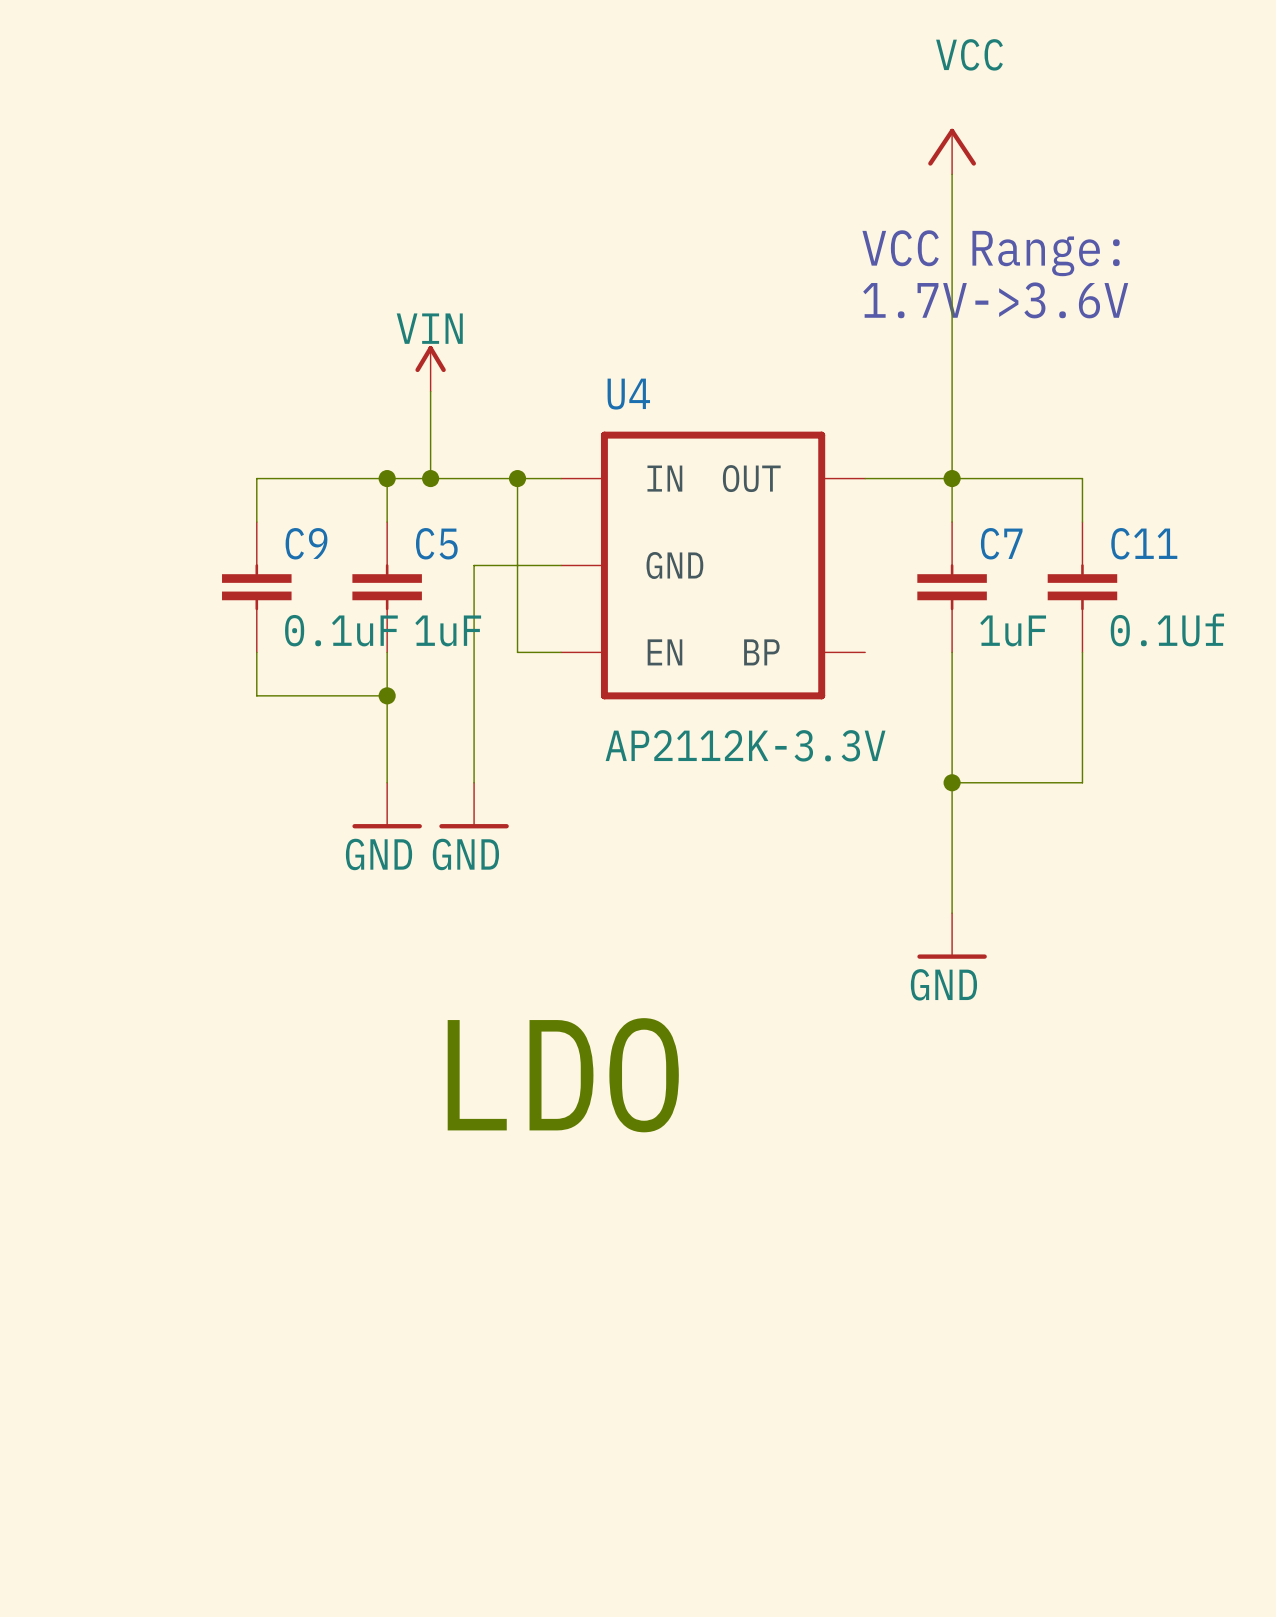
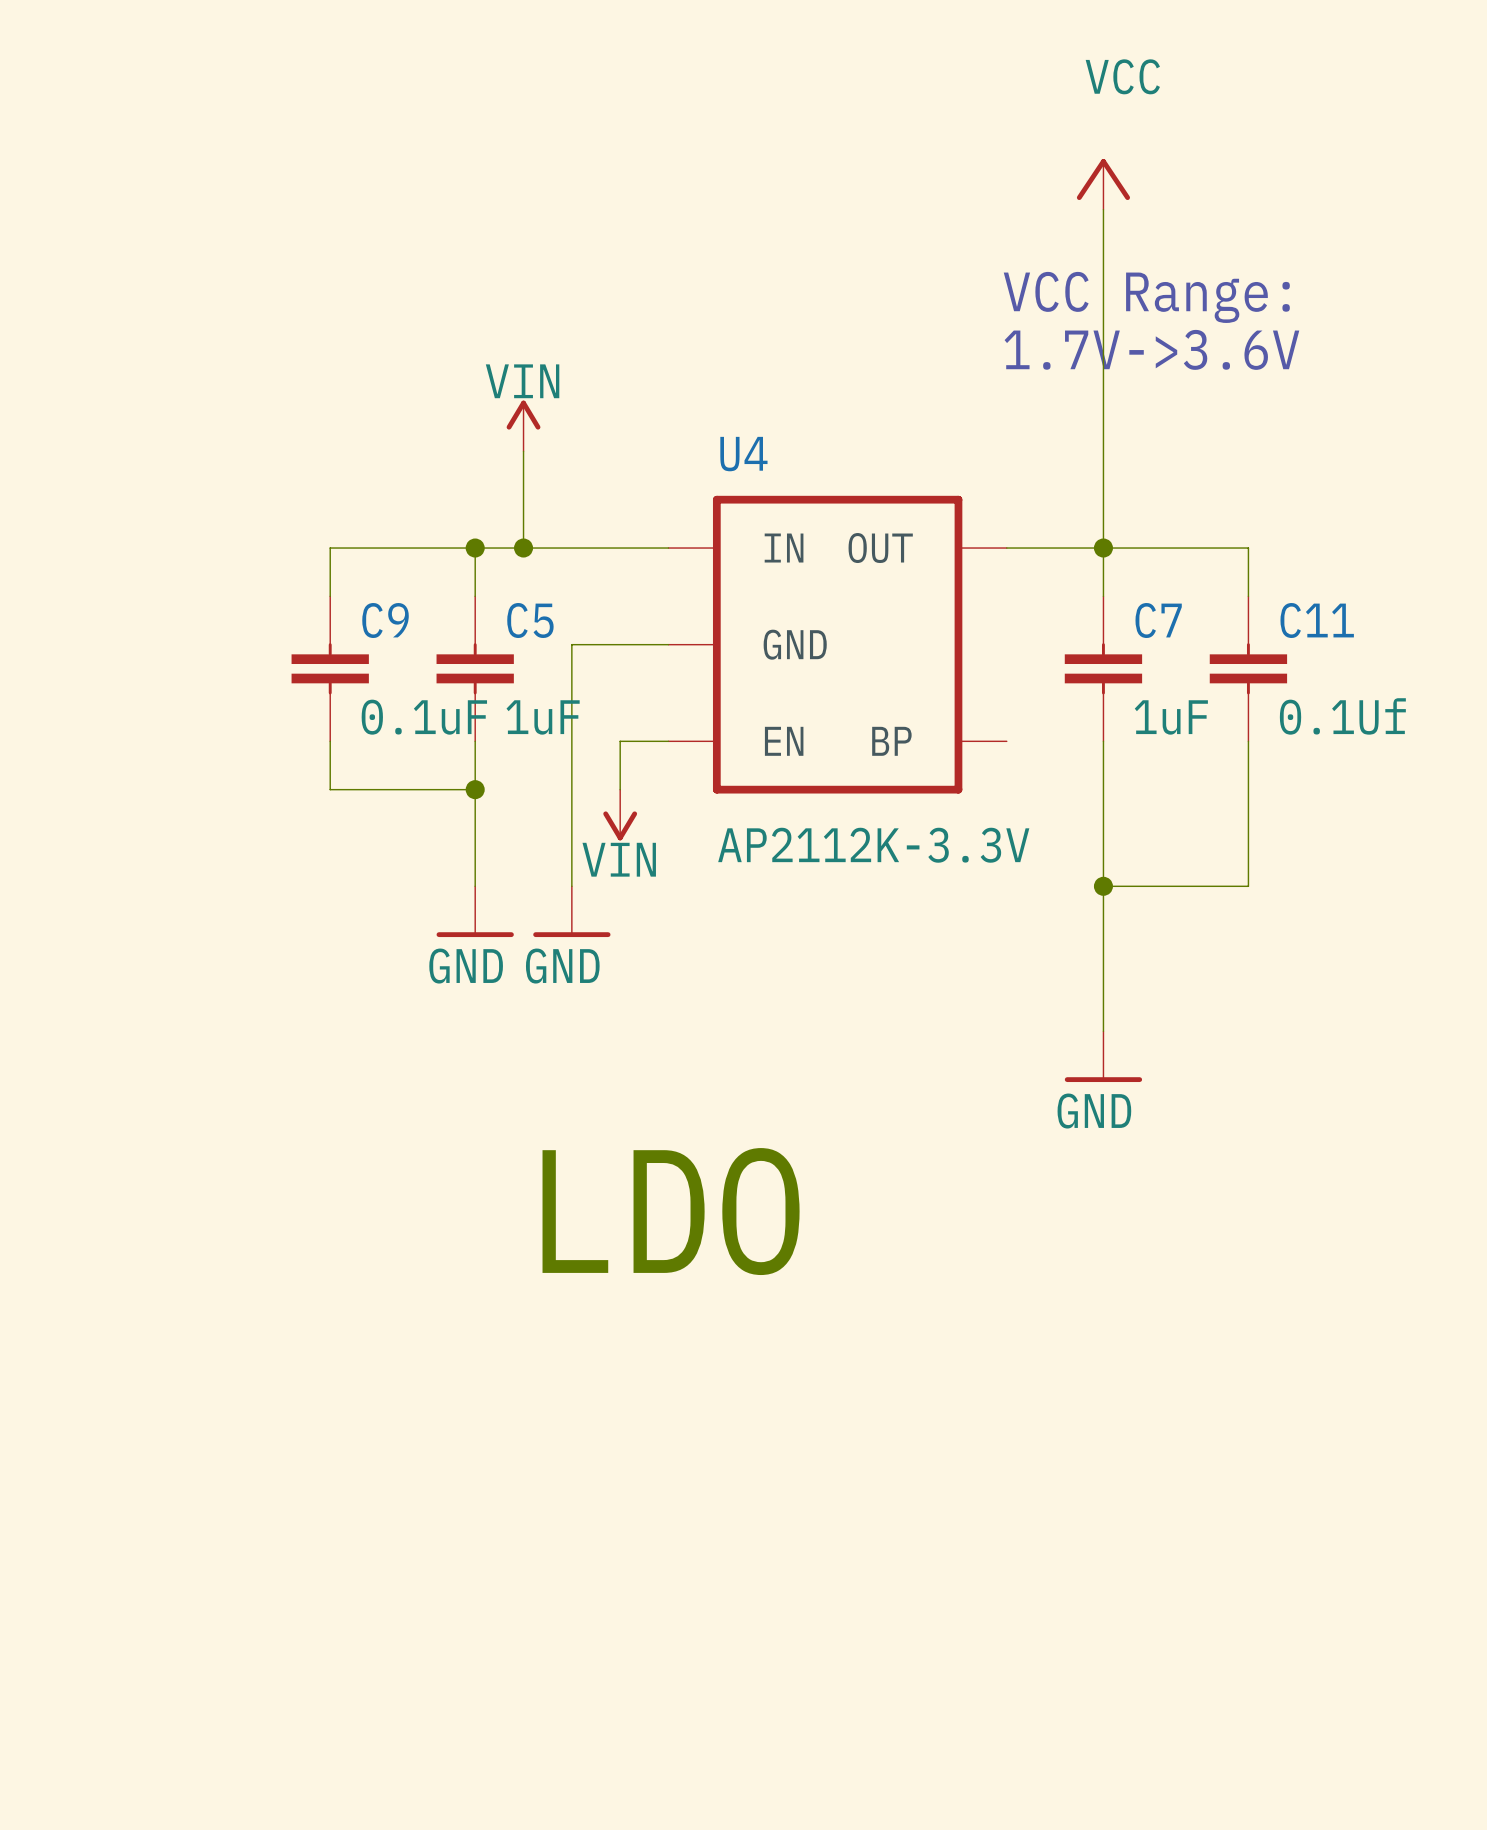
wire: (517, 478) (517, 652) -> (620, 789) (620, 741)
junction: (517, 478) -> none
power symbol: none -> VIN (620, 815)

